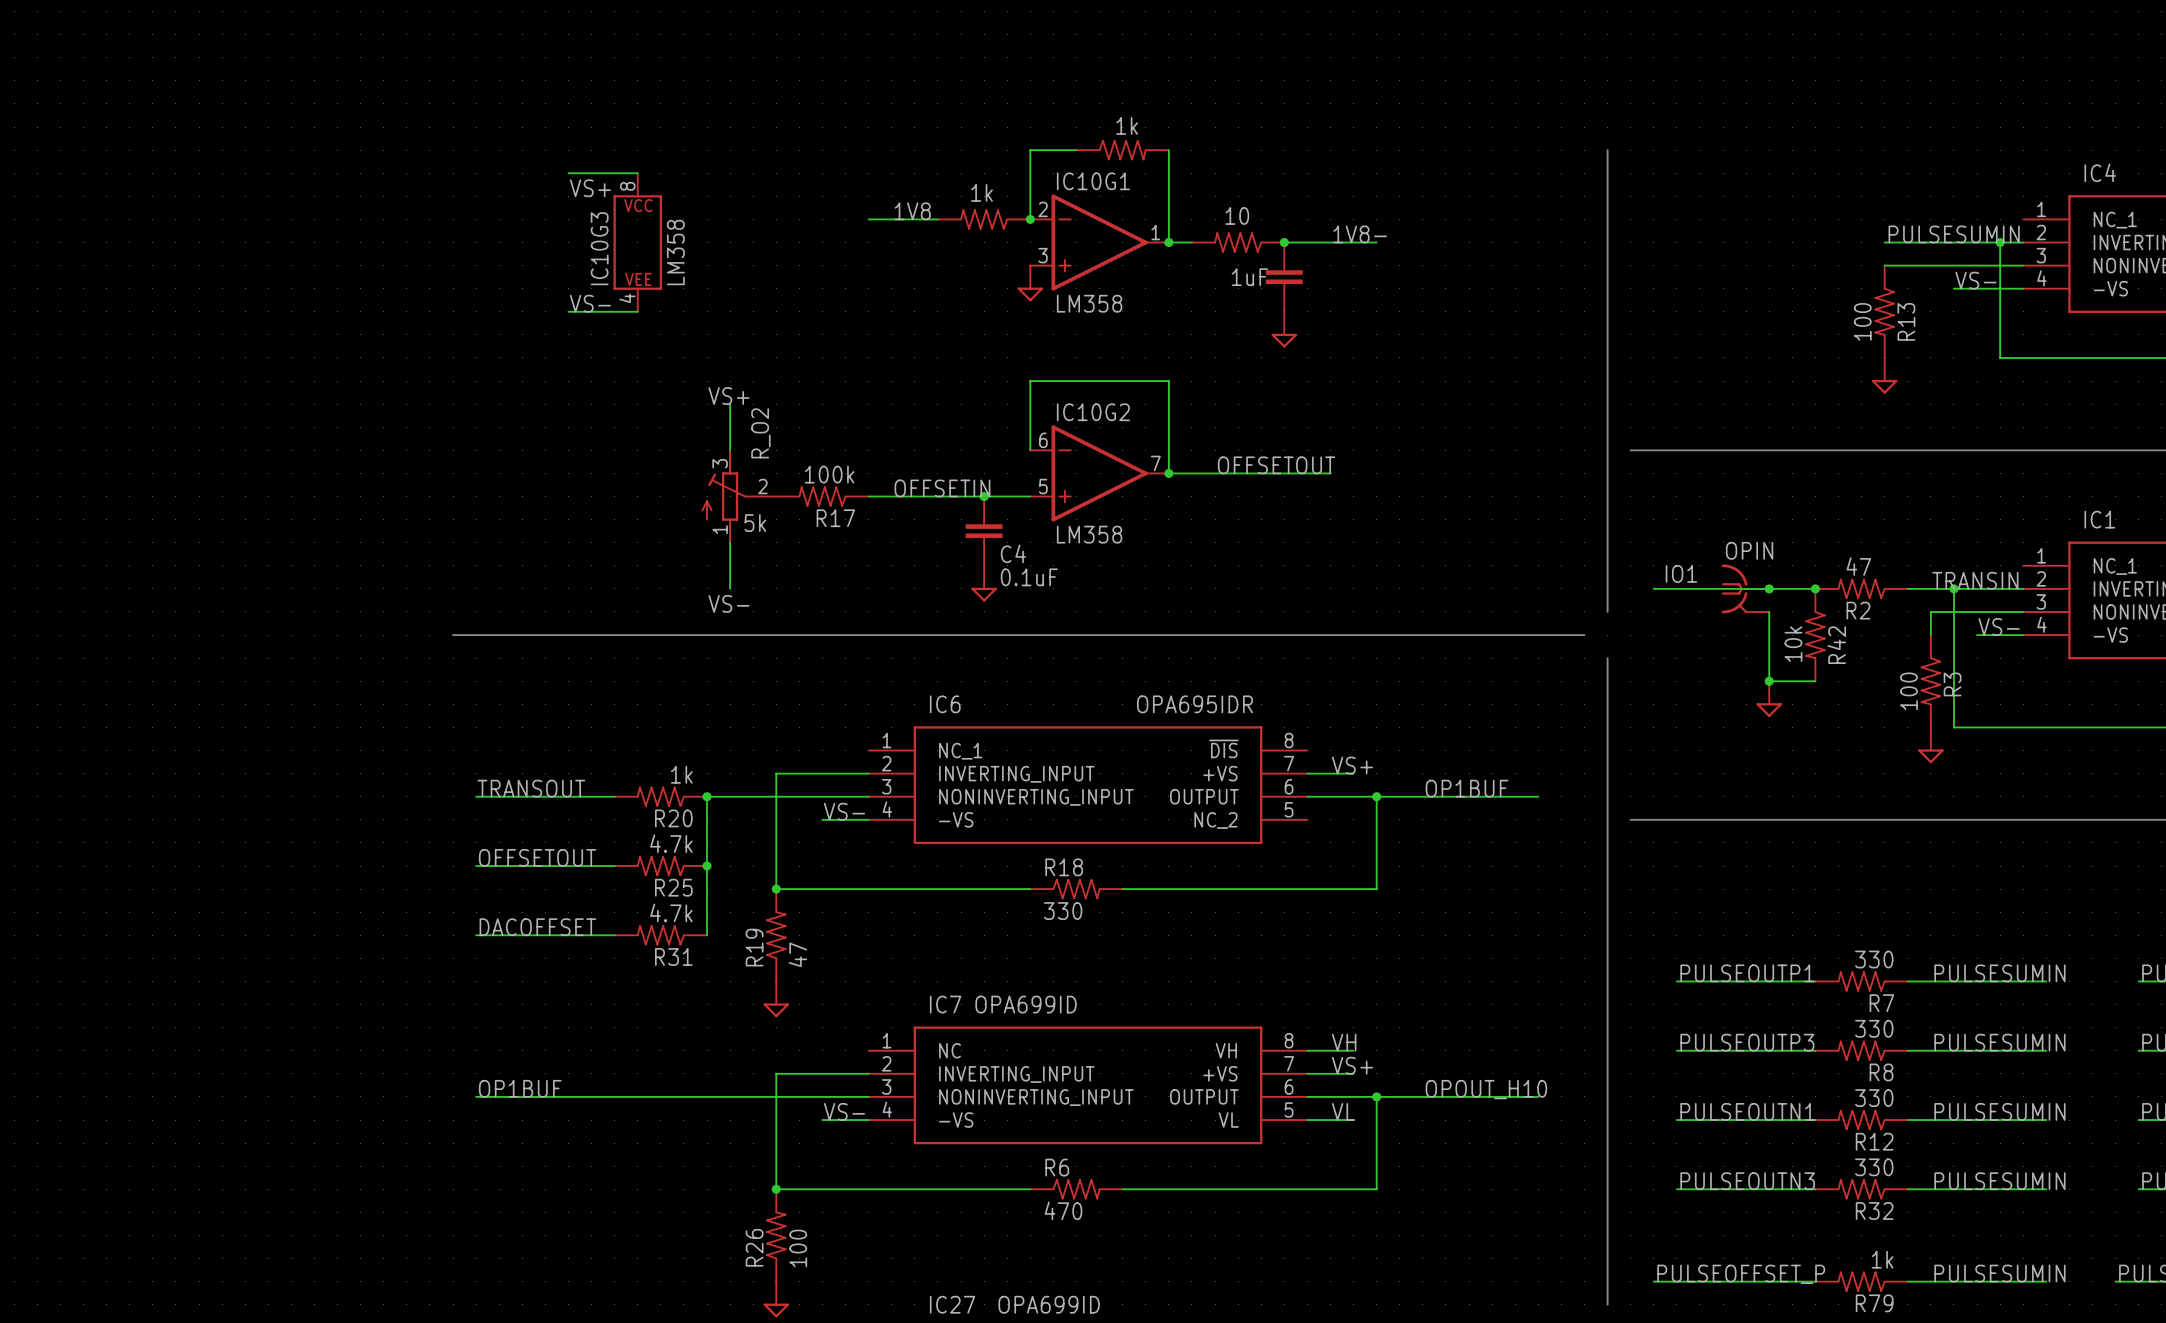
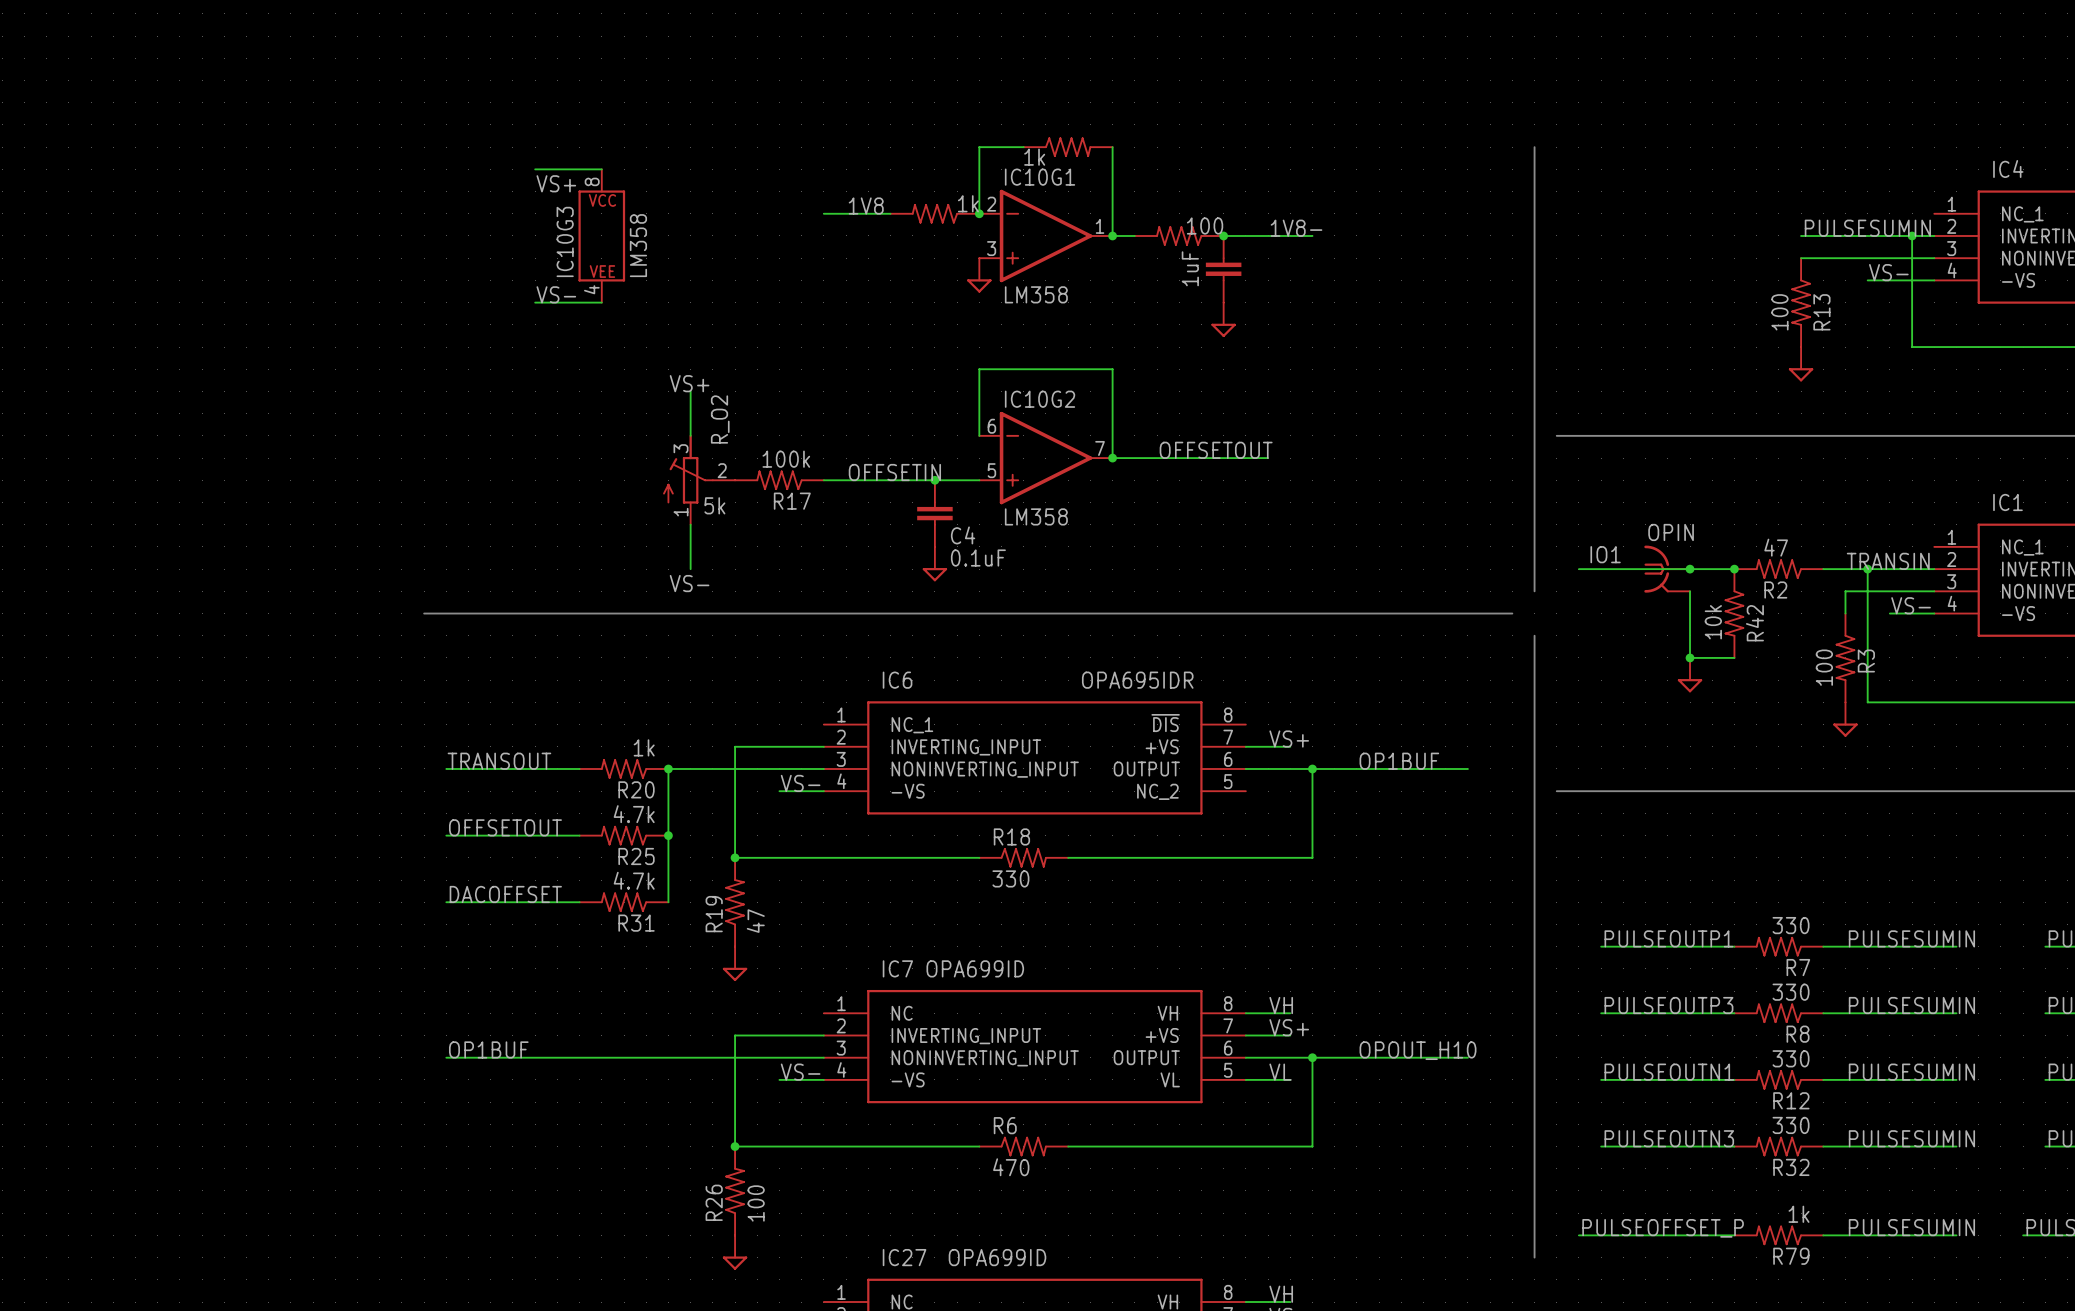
part value position: 1k (1127, 125) -> 1k (1034, 157)
part value position: 1k (982, 192) -> 1k (968, 203)
part value: 10 (1237, 215) -> 100 (1205, 225)
part value rotation: 0° (1249, 277) -> 90° counterclockwise (1190, 268)

